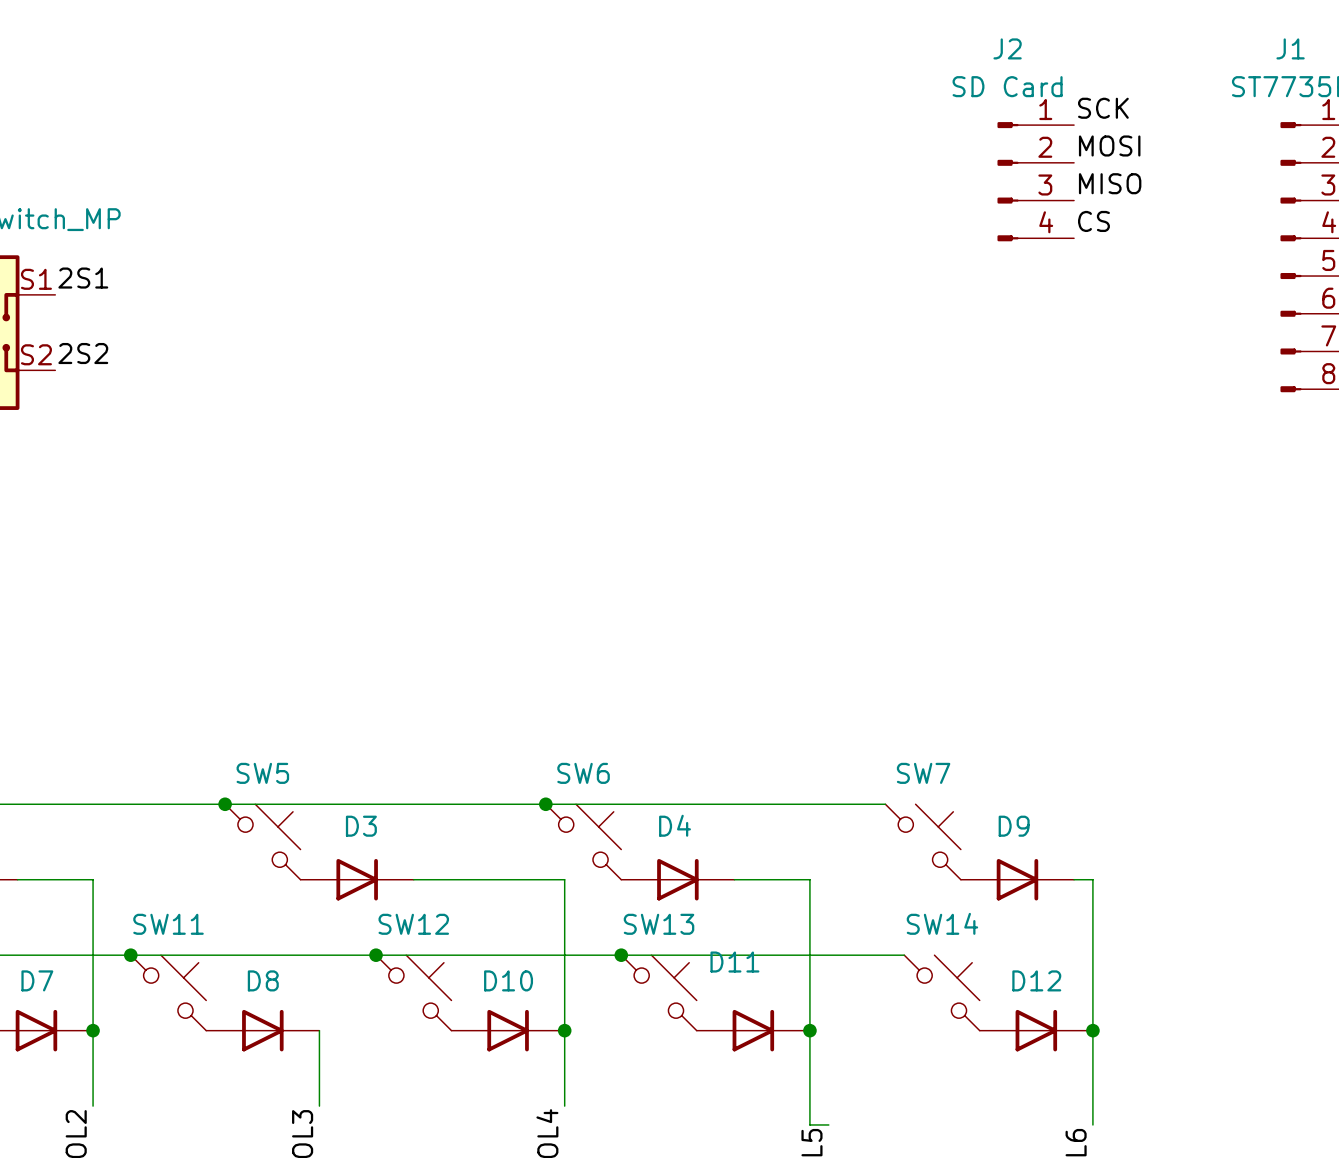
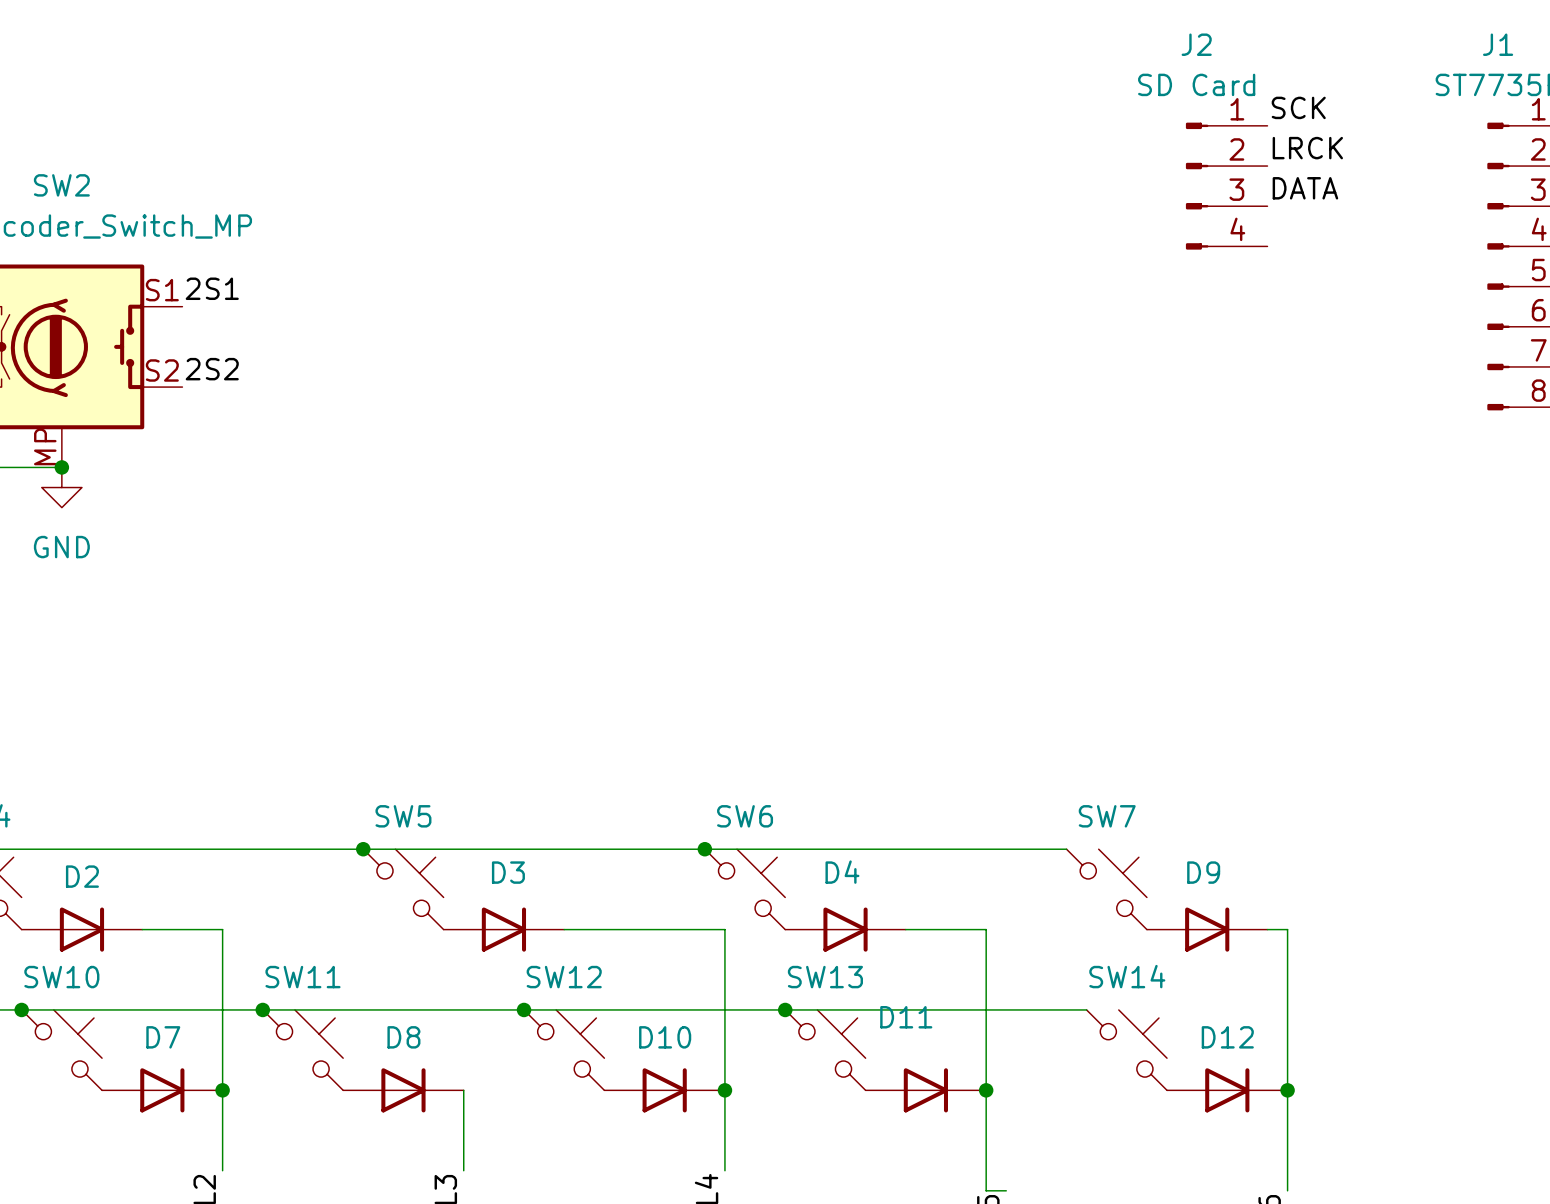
label: MOSI (1109, 145) -> LRCK (1307, 148)
label: MISO (1110, 183) -> DATA (1305, 188)
label: CS (1093, 221) -> none

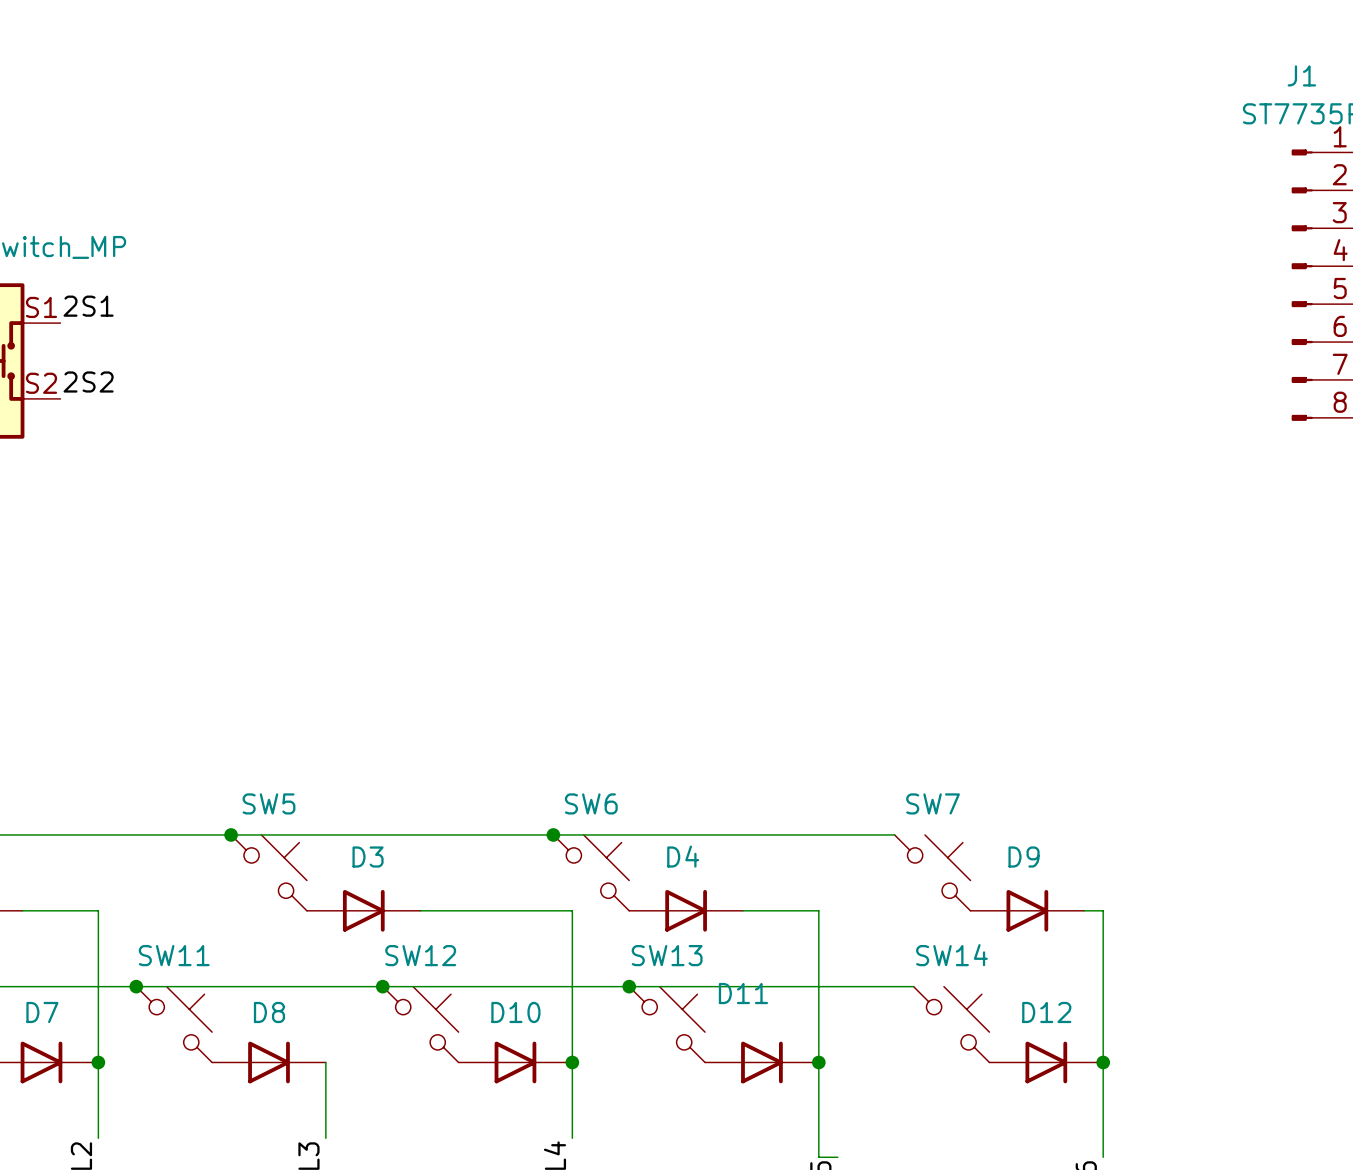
label: SCK (1298, 107) -> none
label: LRCK (1307, 148) -> none
J2: SD Card (1226, 186) -> none
label: DATA (1305, 188) -> none

